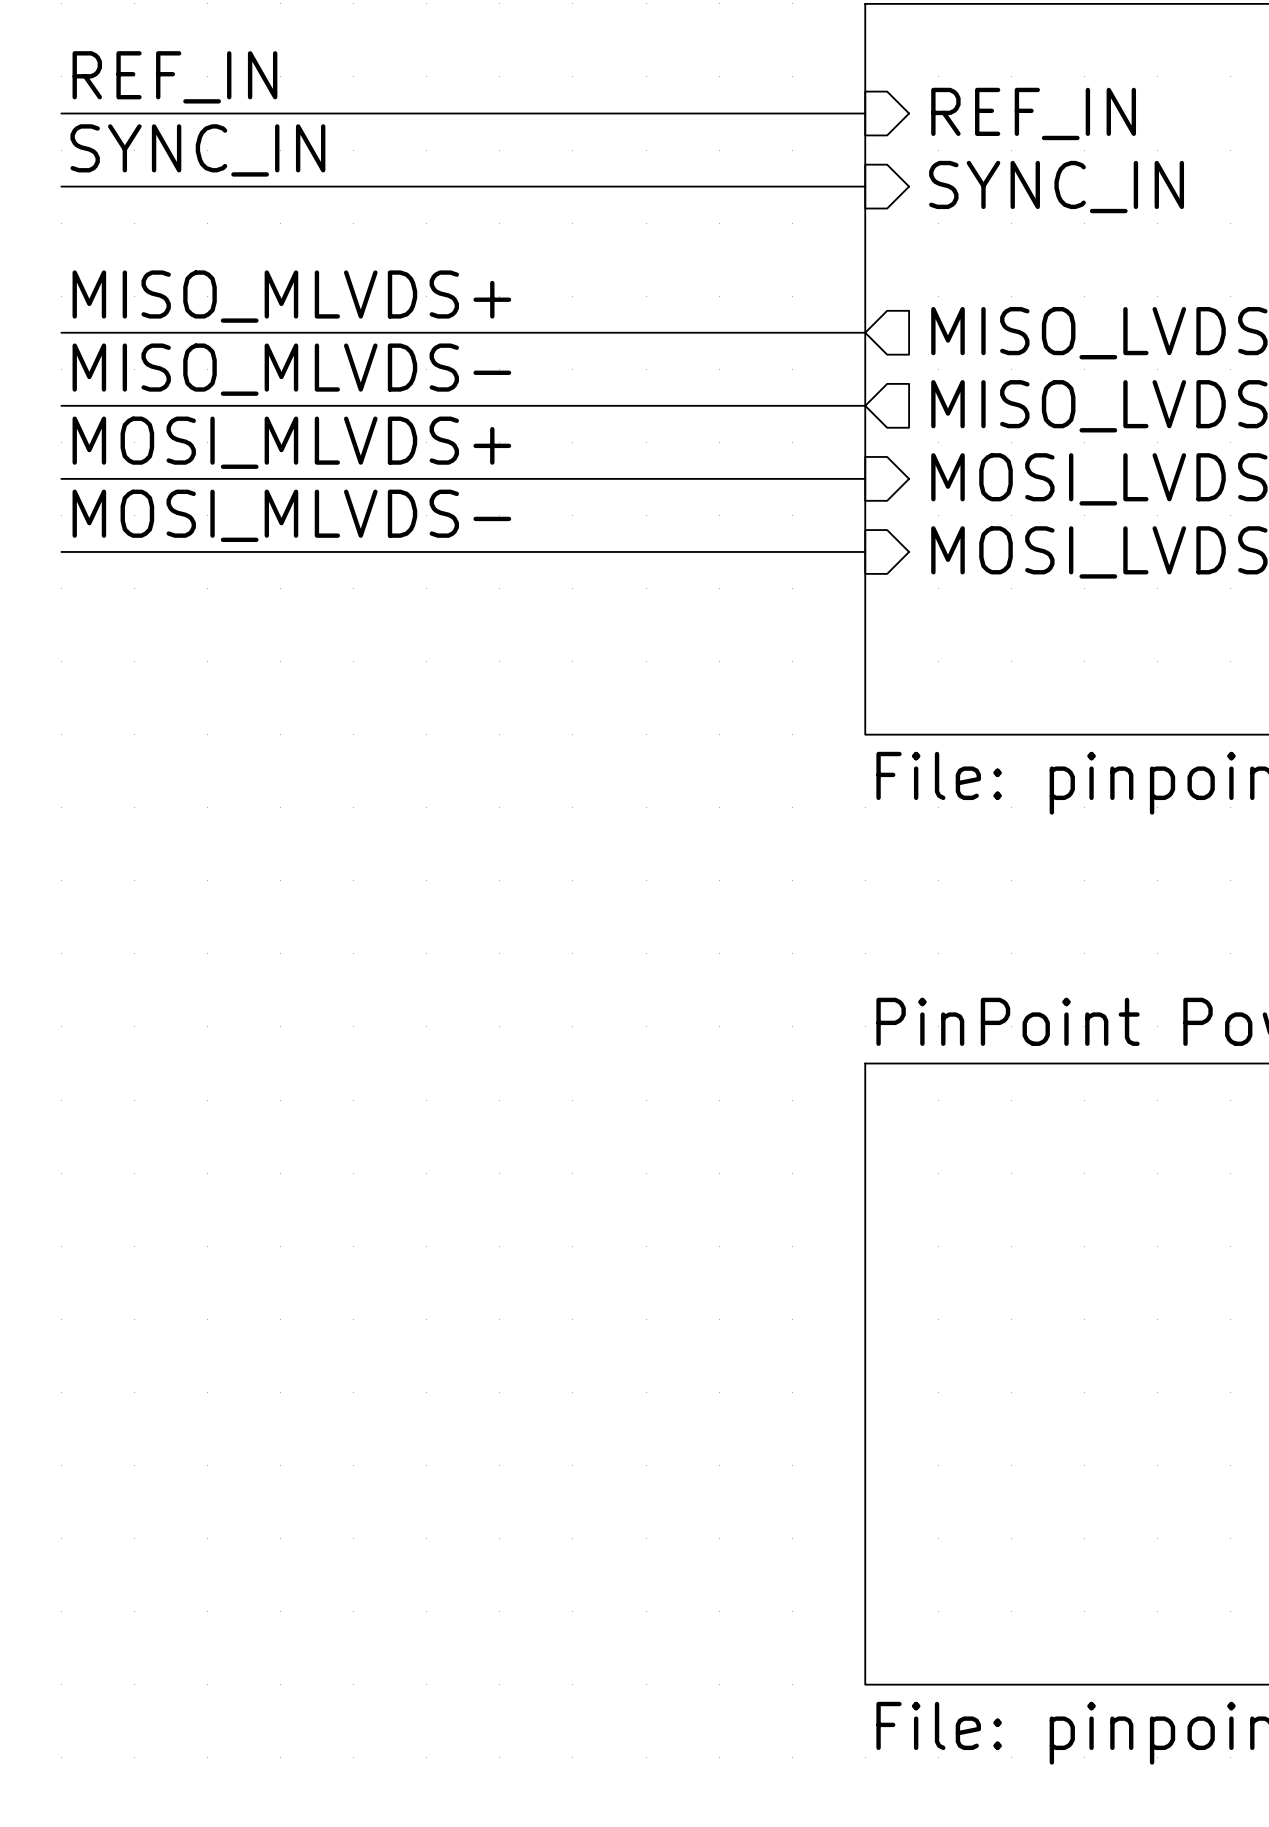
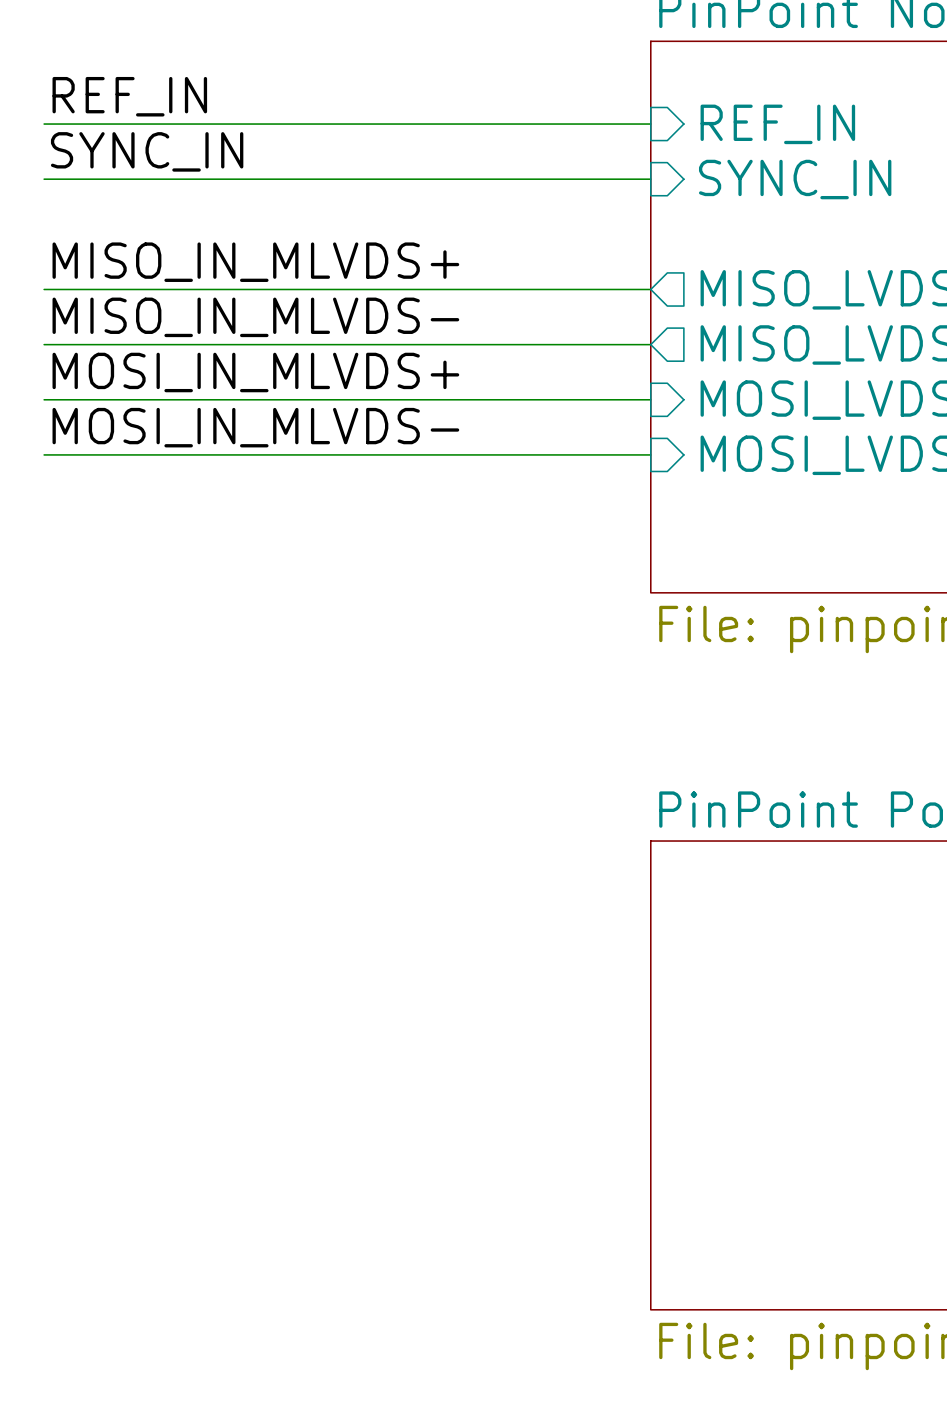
label: MISO_MLVDS+ (291, 296) -> MISO_IN_MLVDS+ (255, 262)
label: MISO_MLVDS- (291, 369) -> MISO_IN_MLVDS- (255, 317)
label: MOSI_MLVDS+ (291, 442) -> MOSI_IN_MLVDS+ (255, 372)
label: MOSI_MLVDS- (291, 515) -> MOSI_IN_MLVDS- (255, 427)

